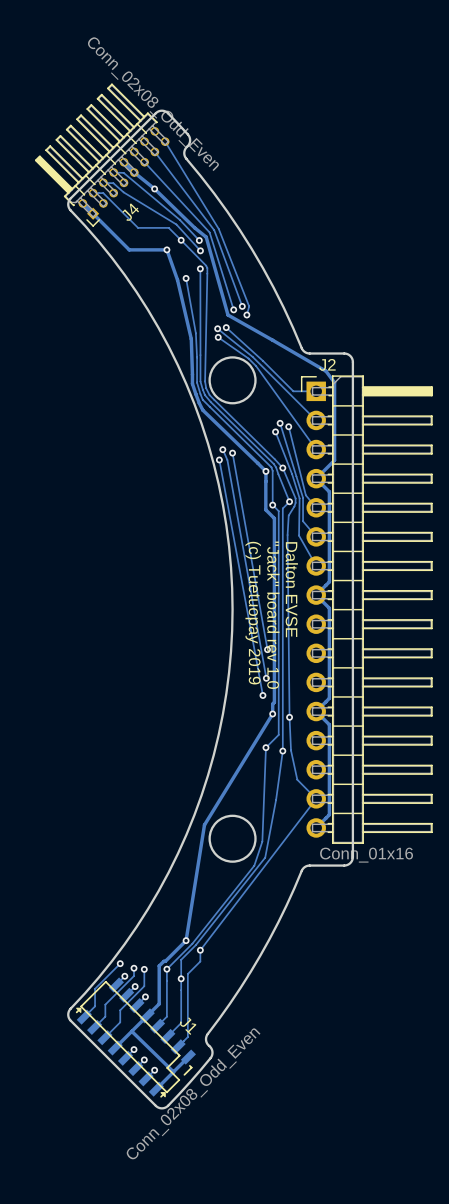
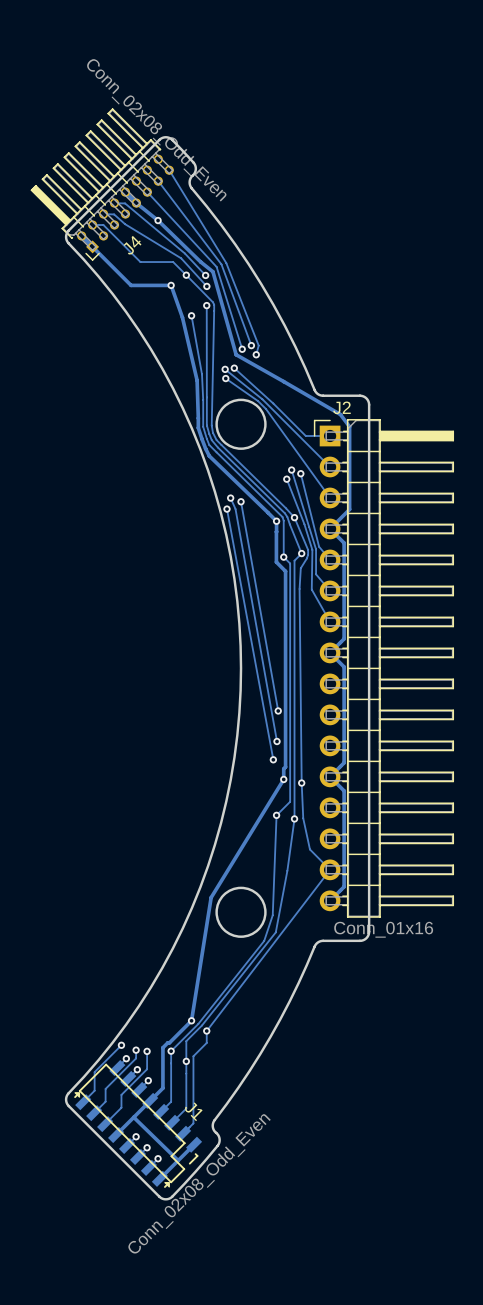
text: Dalton EVSE (291, 589) -> none
text: (c) Tuetuopay 2019 (253, 613) -> none
text: "Jack" board rev 1.0 (273, 615) -> none

